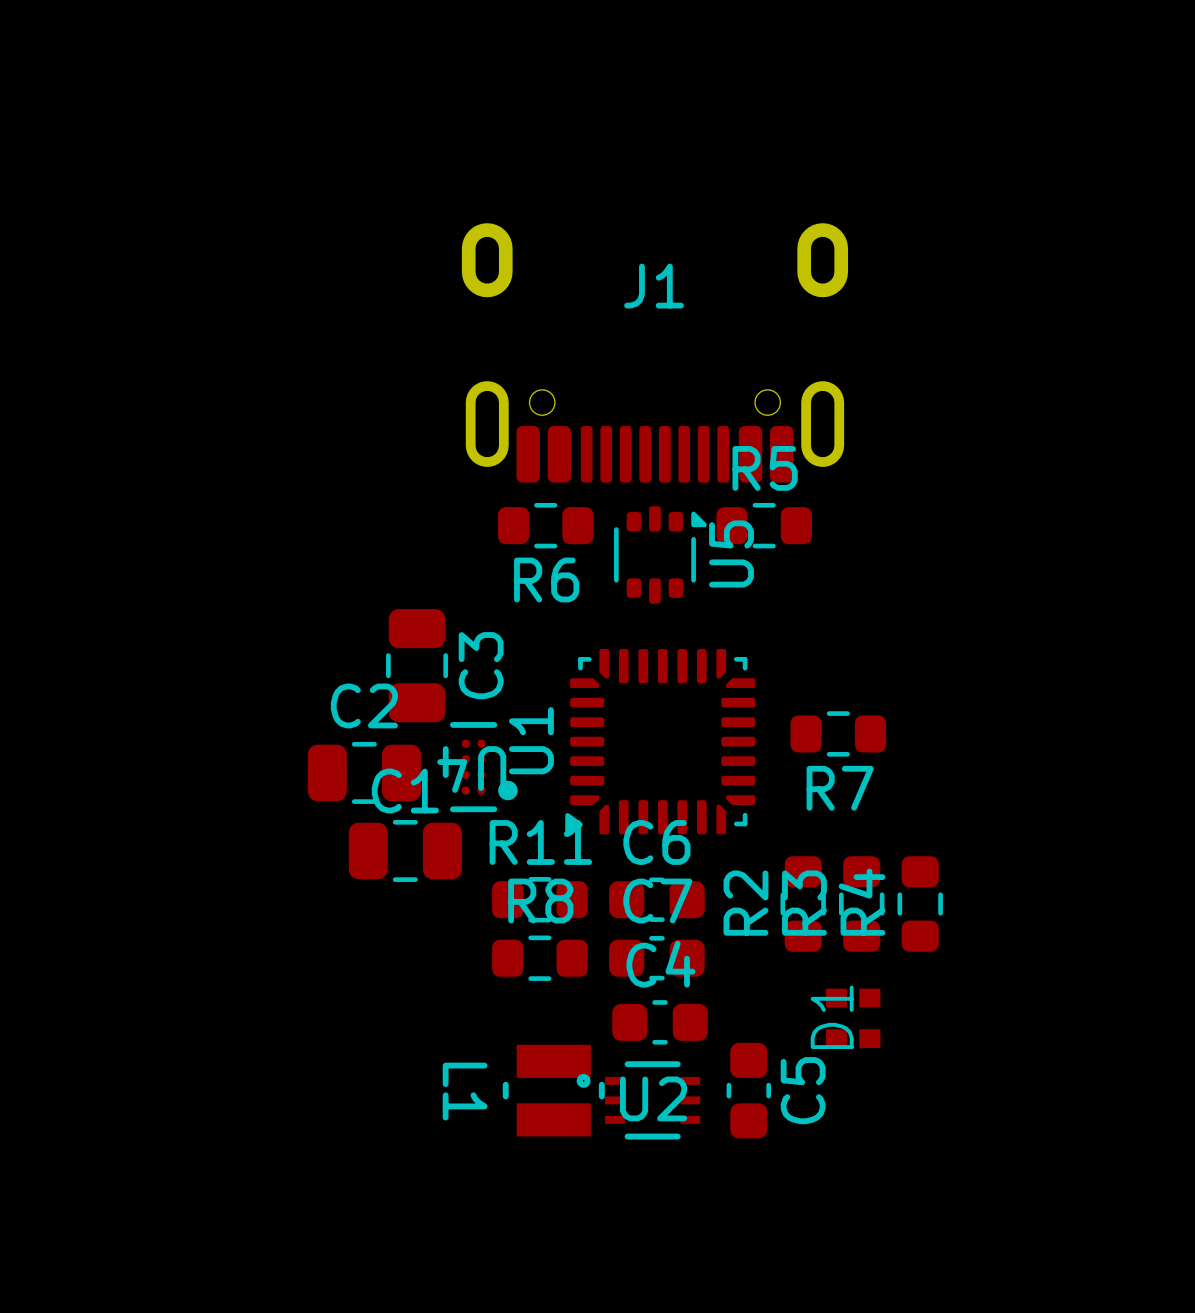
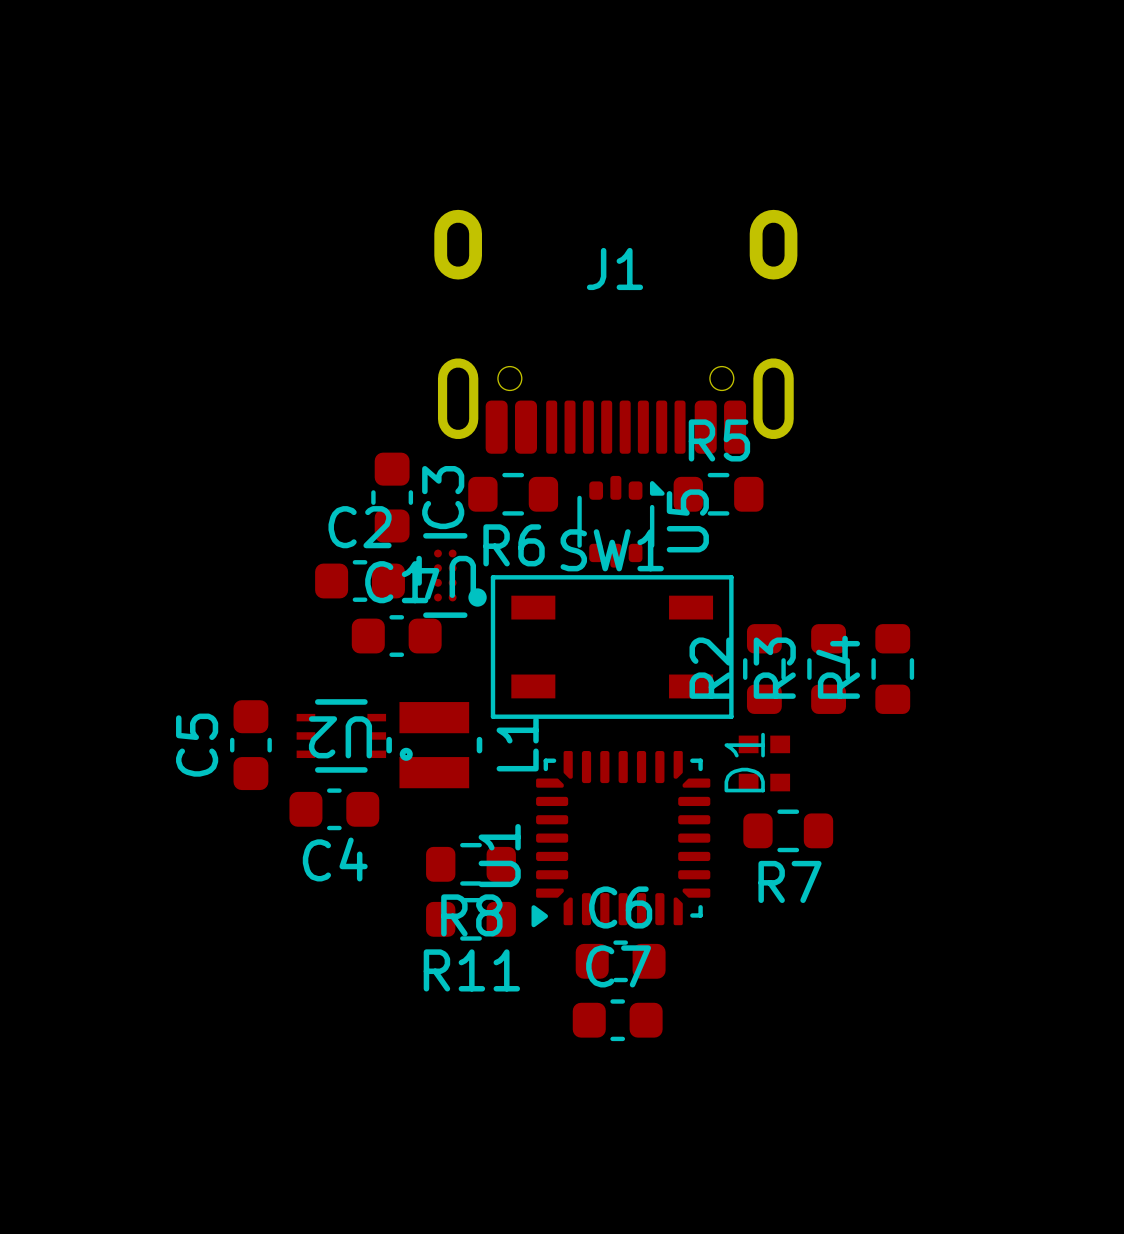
C3 footprint: [386, 609, 449, 723] -> [371, 452, 414, 543]
SW1: none -> (612, 647)
R7 position: (838, 733) -> (788, 830)
U1 name position: U1 (531, 740) -> U1 (499, 855)
C2 footprint: [307, 741, 421, 804] -> [315, 560, 405, 602]
U1 position: (660, 742) -> (620, 839)
U4 position: (483, 767) -> (454, 575)
C1 footprint: [348, 819, 462, 882] -> [351, 615, 442, 657]
R11 name position: R11 (540, 842) -> R11 (471, 970)
C4: none -> (334, 809)
R11 position: (539, 899) -> (470, 919)
C6: (656, 899) -> none
R8 name position: R8 (540, 900) -> R8 (471, 915)
R2 position: (803, 904) -> (764, 669)
R3 position: (861, 904) -> (828, 669)
R4 position: (920, 904) -> (892, 669)
R8 position: (539, 958) -> (470, 864)
C7 position: (656, 958) -> (617, 1020)
C4 name: C4 (660, 964) -> C6 (620, 907)
D1 position: (853, 1018) -> (764, 763)
L1 position: (553, 1090) -> (434, 745)
C5 position: (748, 1090) -> (250, 745)
C5 name position: C5 (803, 1090) -> C5 (197, 745)
L1 name rotation: 0° (465, 1091) -> 180° (517, 744)
L1 name position: L1 (465, 1091) -> L1 (517, 744)
U2 rotation: 0° (638, 1100) -> 180° (354, 735)
U2 position: (638, 1100) -> (354, 735)

